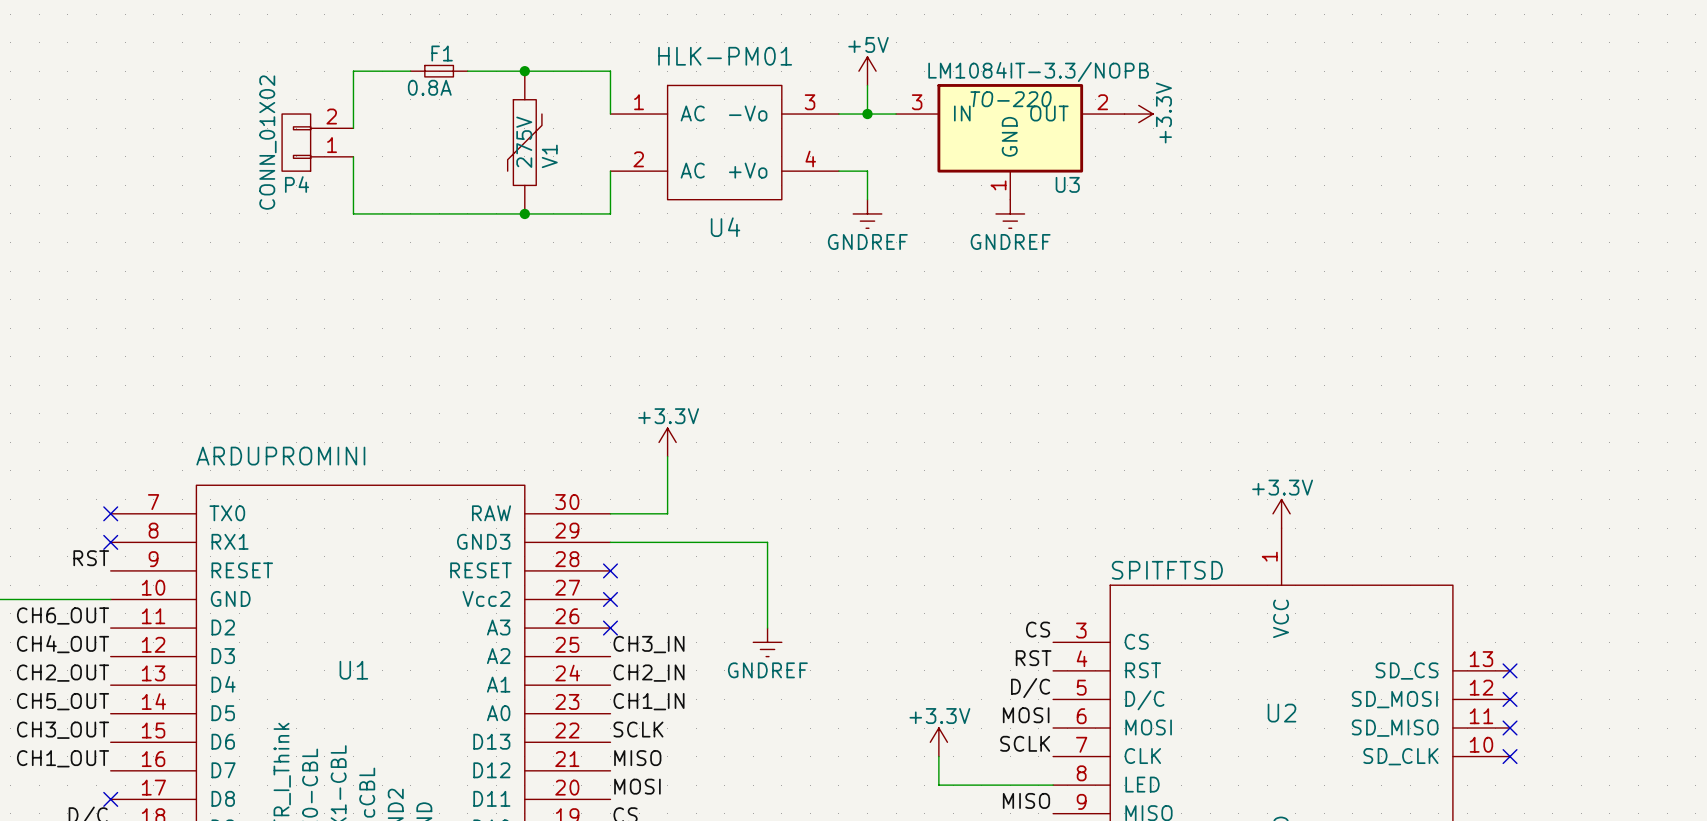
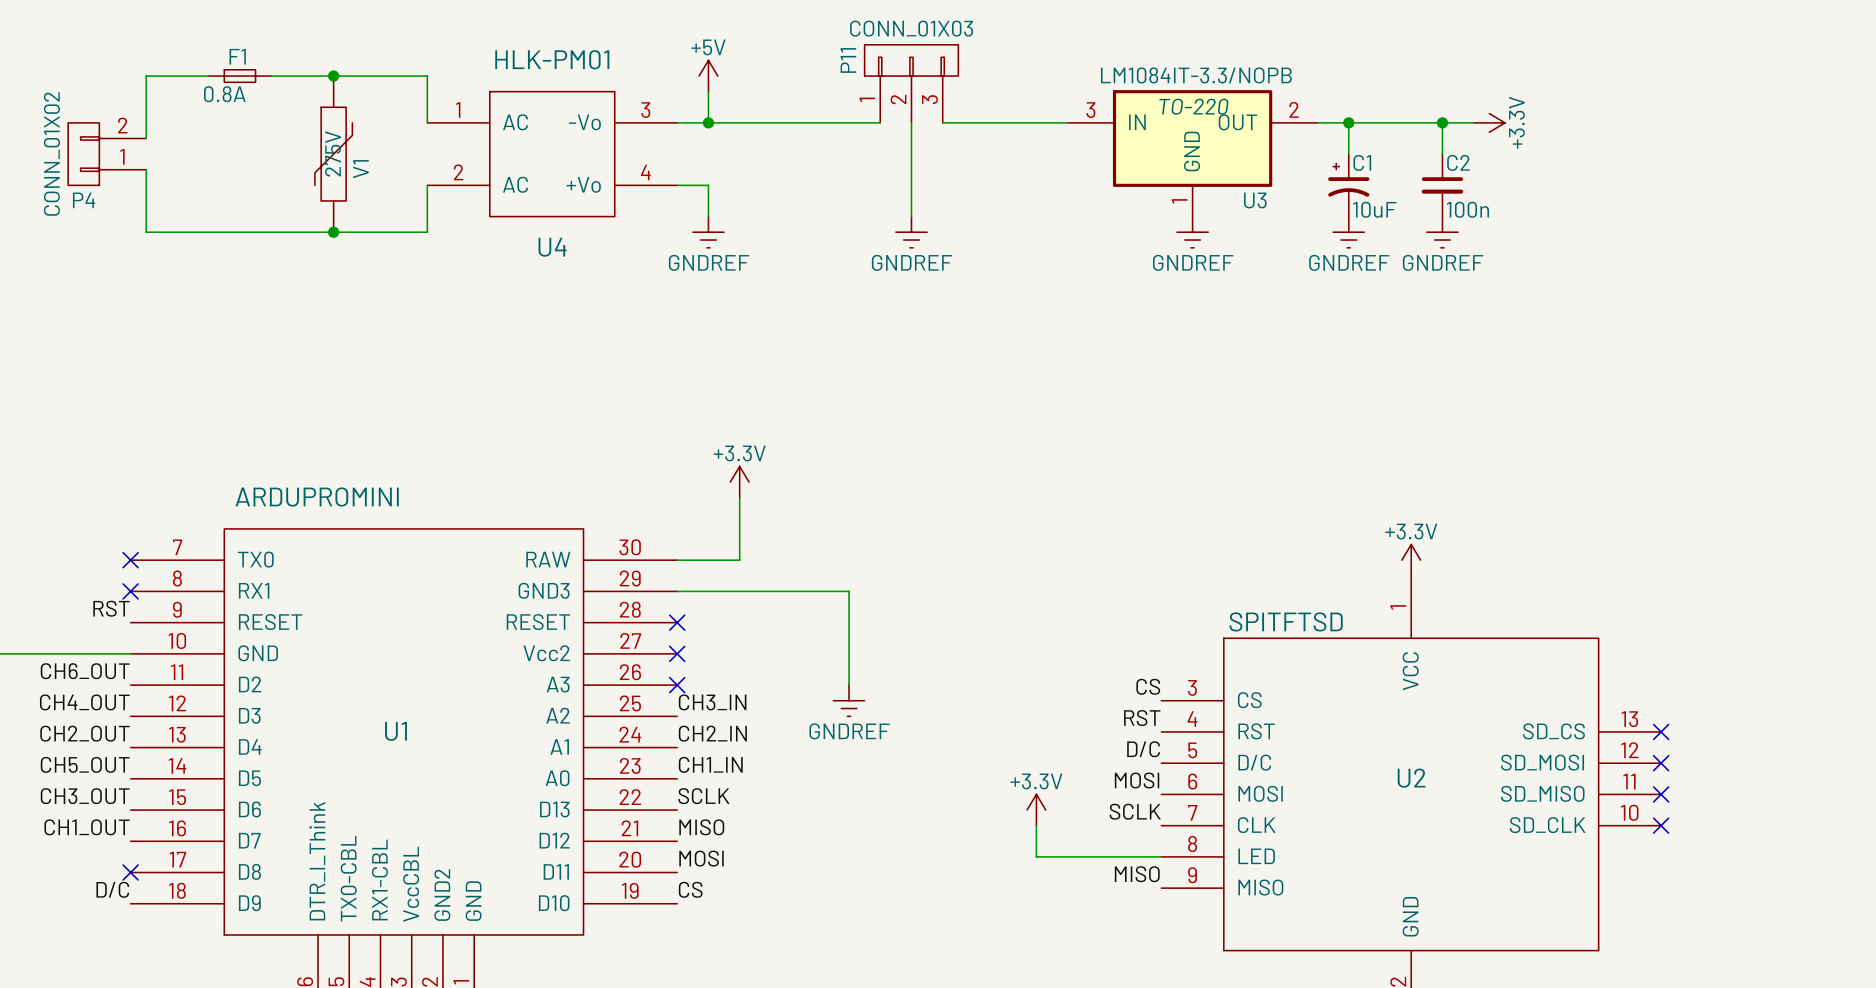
wire: none -> (208, 76) (146, 76) (146, 138)
junction: none -> (333, 76)
wire: (353, 71) (353, 128) -> (396, 76) (271, 76)
wire: (382, 71) (410, 71) -> (427, 76) (427, 122)
F1 position: (439, 71) -> (239, 76)
wire: (467, 71) (610, 71) (610, 114) -> (880, 122) (677, 122)
junction: (524, 71) -> none
power symbol position: +5V (867, 71) -> +5V (708, 76)
P11: none -> CONN_01X03 (911, 83)
wire: (867, 85) (867, 114) -> (708, 91) (708, 122)
junction: none -> (708, 122)
wire: none -> (911, 122) (911, 216)
wire: (838, 114) (853, 114) -> none
junction: (867, 114) -> none
power symbol position: +3.3V (1138, 114) -> +3.3V (1489, 122)
wire: none -> (1317, 122) (1473, 122)
wire: none -> (1348, 122) (1348, 154)
junction: none -> (1348, 122)
wire: none -> (1442, 122) (1442, 154)
junction: none -> (1442, 122)
U3 position: (1010, 141) -> (1192, 153)
P4 position: (317, 142) -> (107, 154)
V1 position: (524, 142) -> (333, 154)
U4 position: (724, 142) -> (552, 154)
wire: (353, 156) (353, 213) -> (146, 169) (146, 232) (396, 232)
wire: (610, 171) (610, 213) (382, 213) -> (427, 185) (427, 232)
wire: (838, 171) (867, 171) (867, 199) -> (677, 185) (708, 185) (708, 216)
C1: none -> 10uF (1348, 185)
C2: none -> 100n (1442, 185)
junction: none -> (333, 232)
junction: (524, 213) -> none
power symbol: none -> GNDREF (708, 232)
power symbol position: GNDREF (867, 213) -> GNDREF (911, 232)
power symbol position: GNDREF (1010, 213) -> GNDREF (1192, 232)
power symbol: none -> GNDREF (1348, 232)
power symbol: none -> GNDREF (1442, 232)

